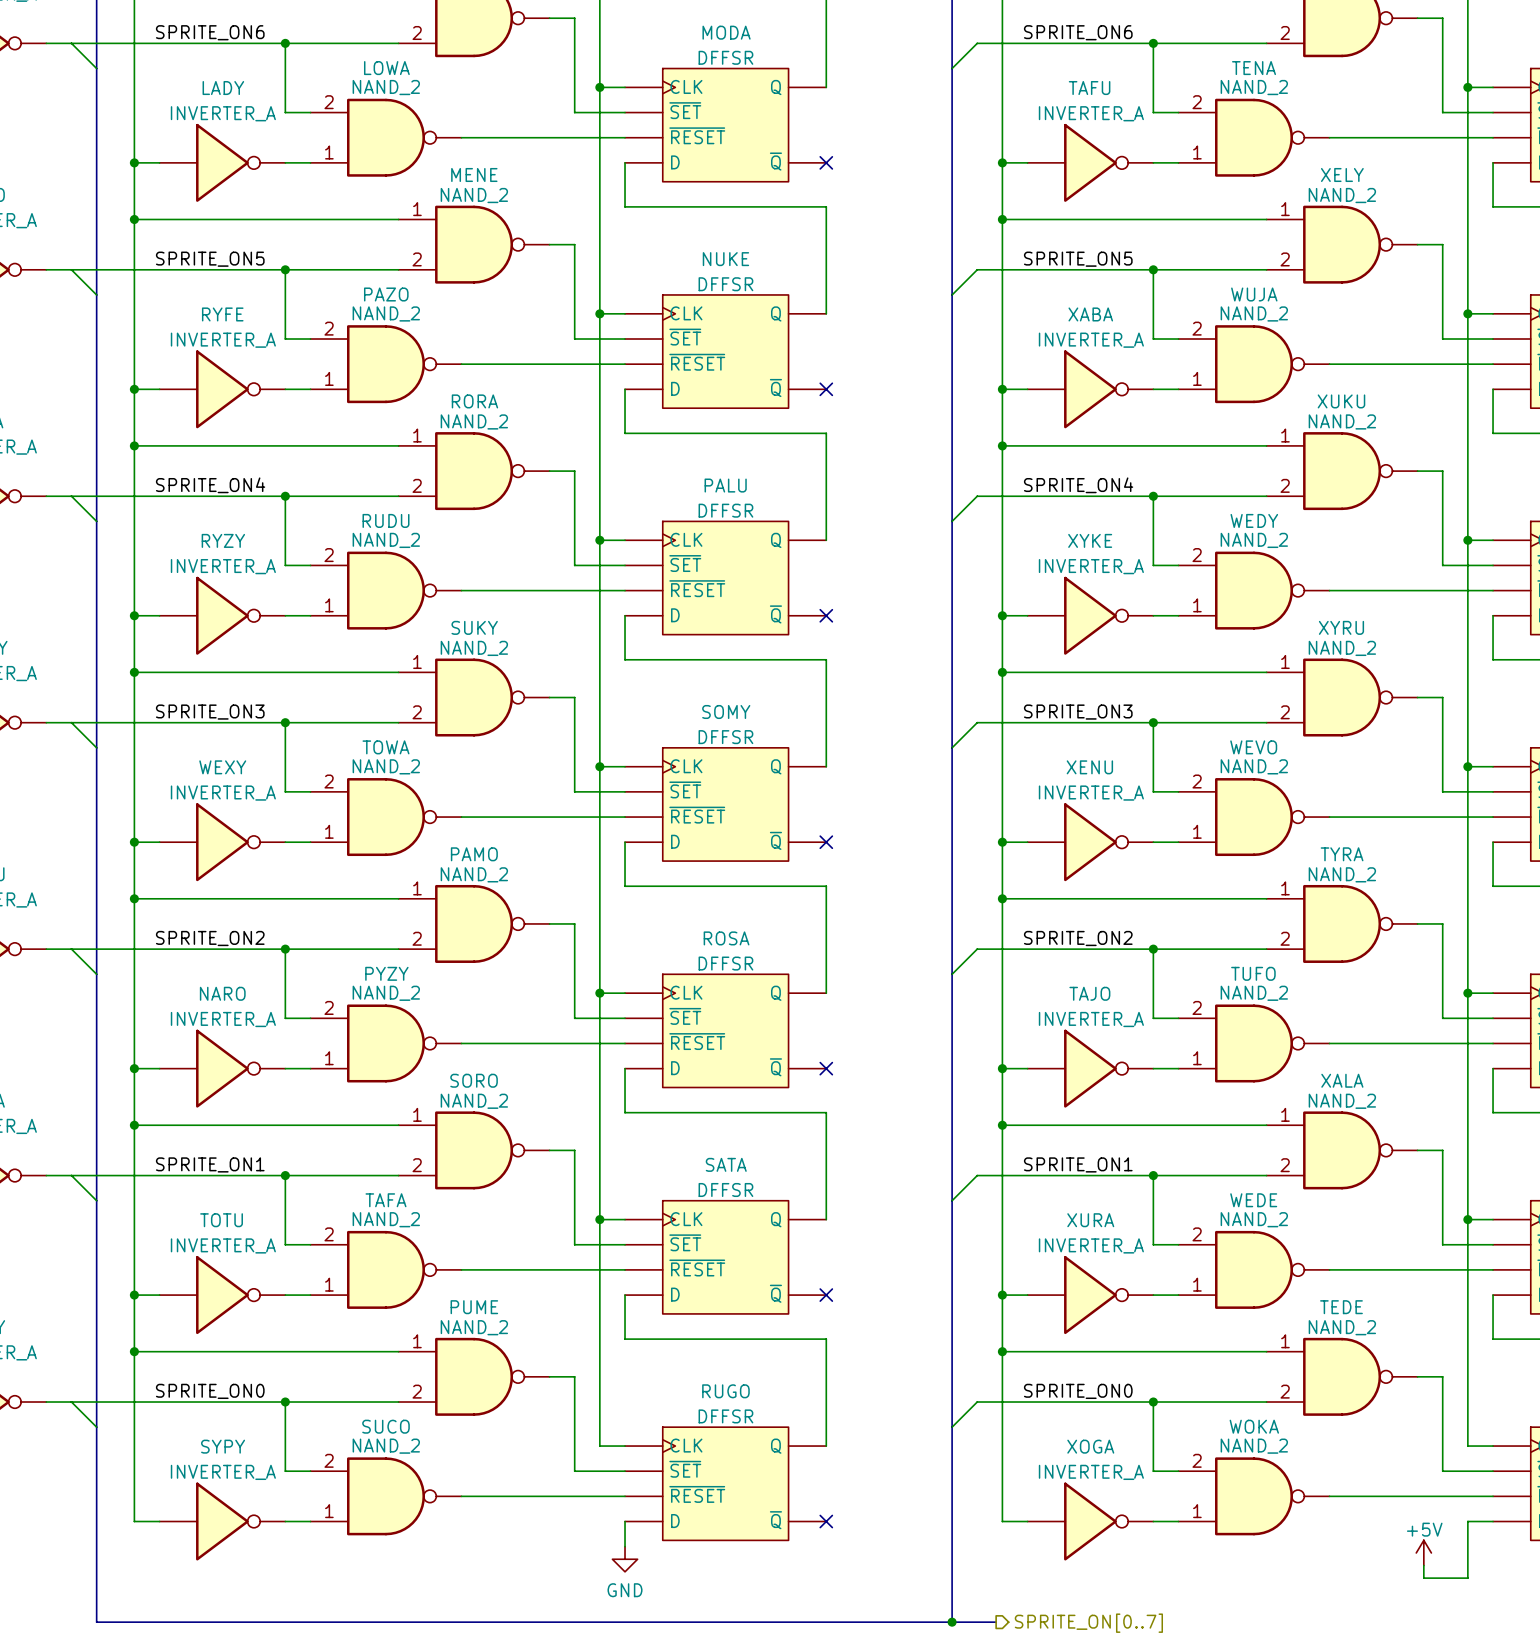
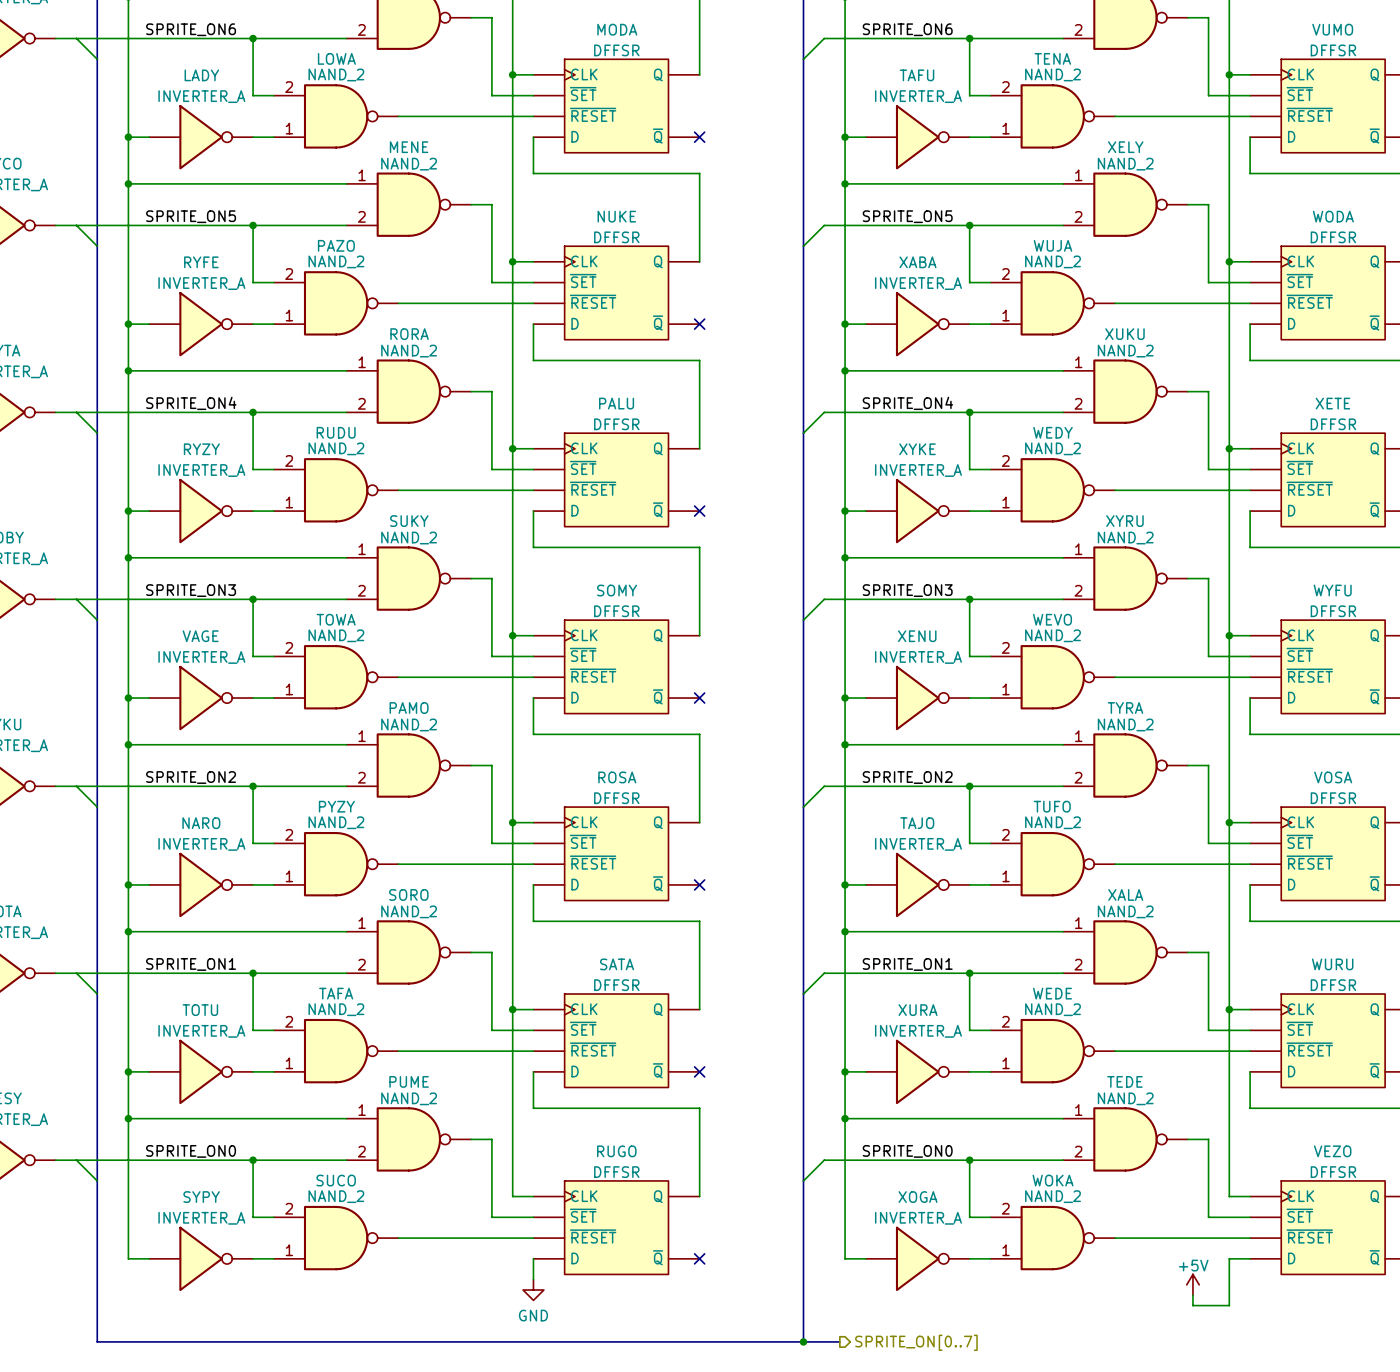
WEXY name: WEXY (222, 767) -> VAGE (200, 636)

